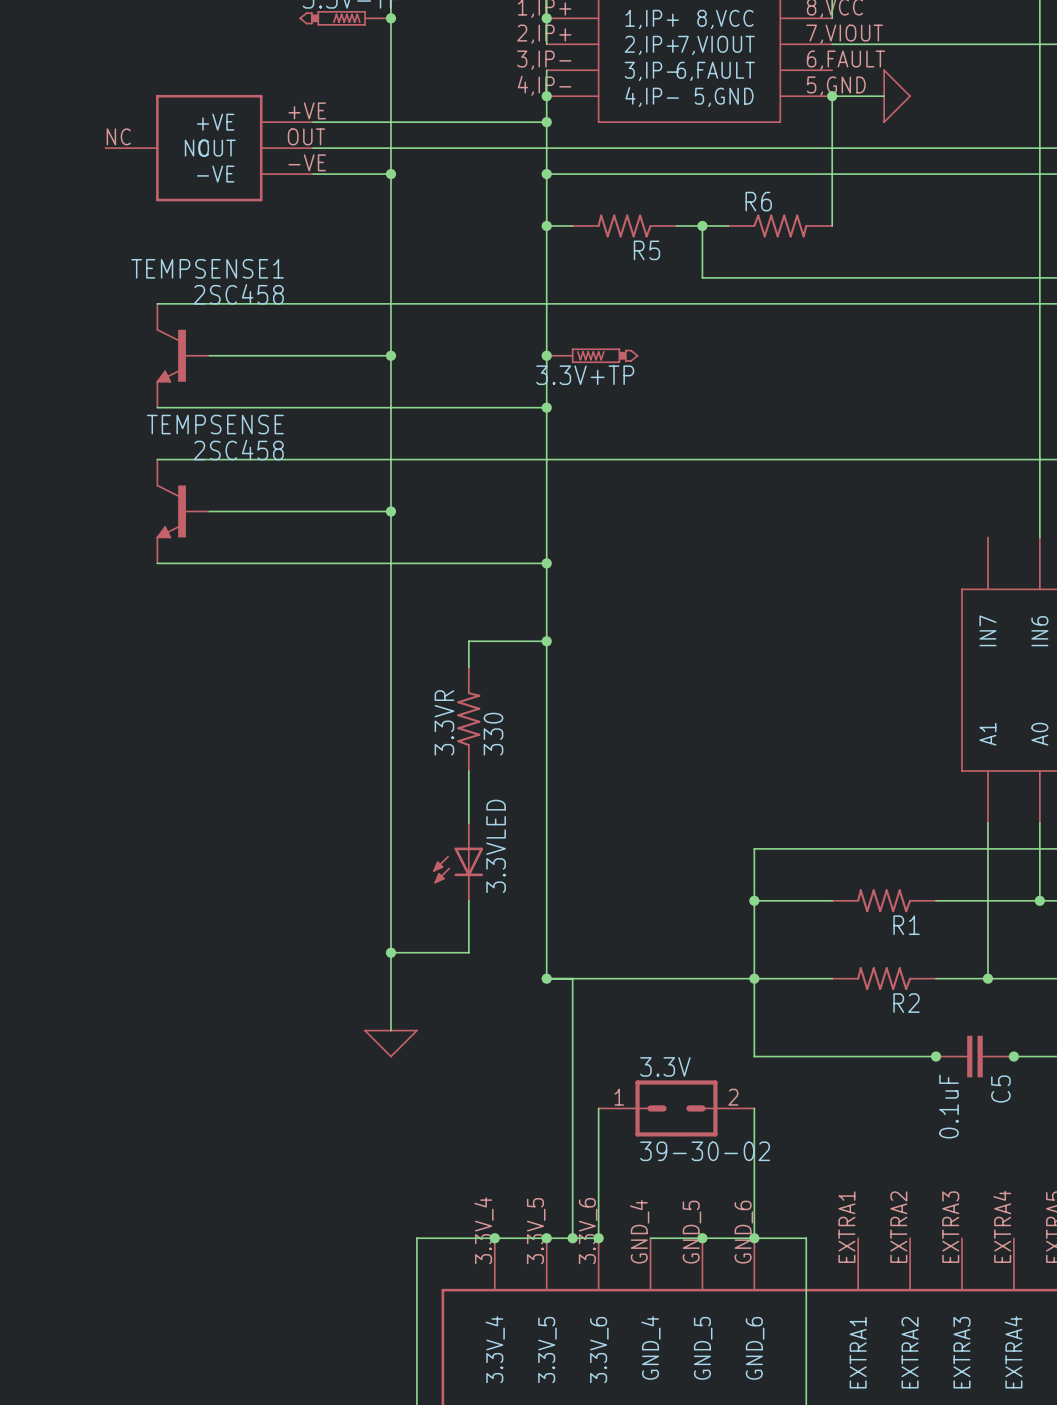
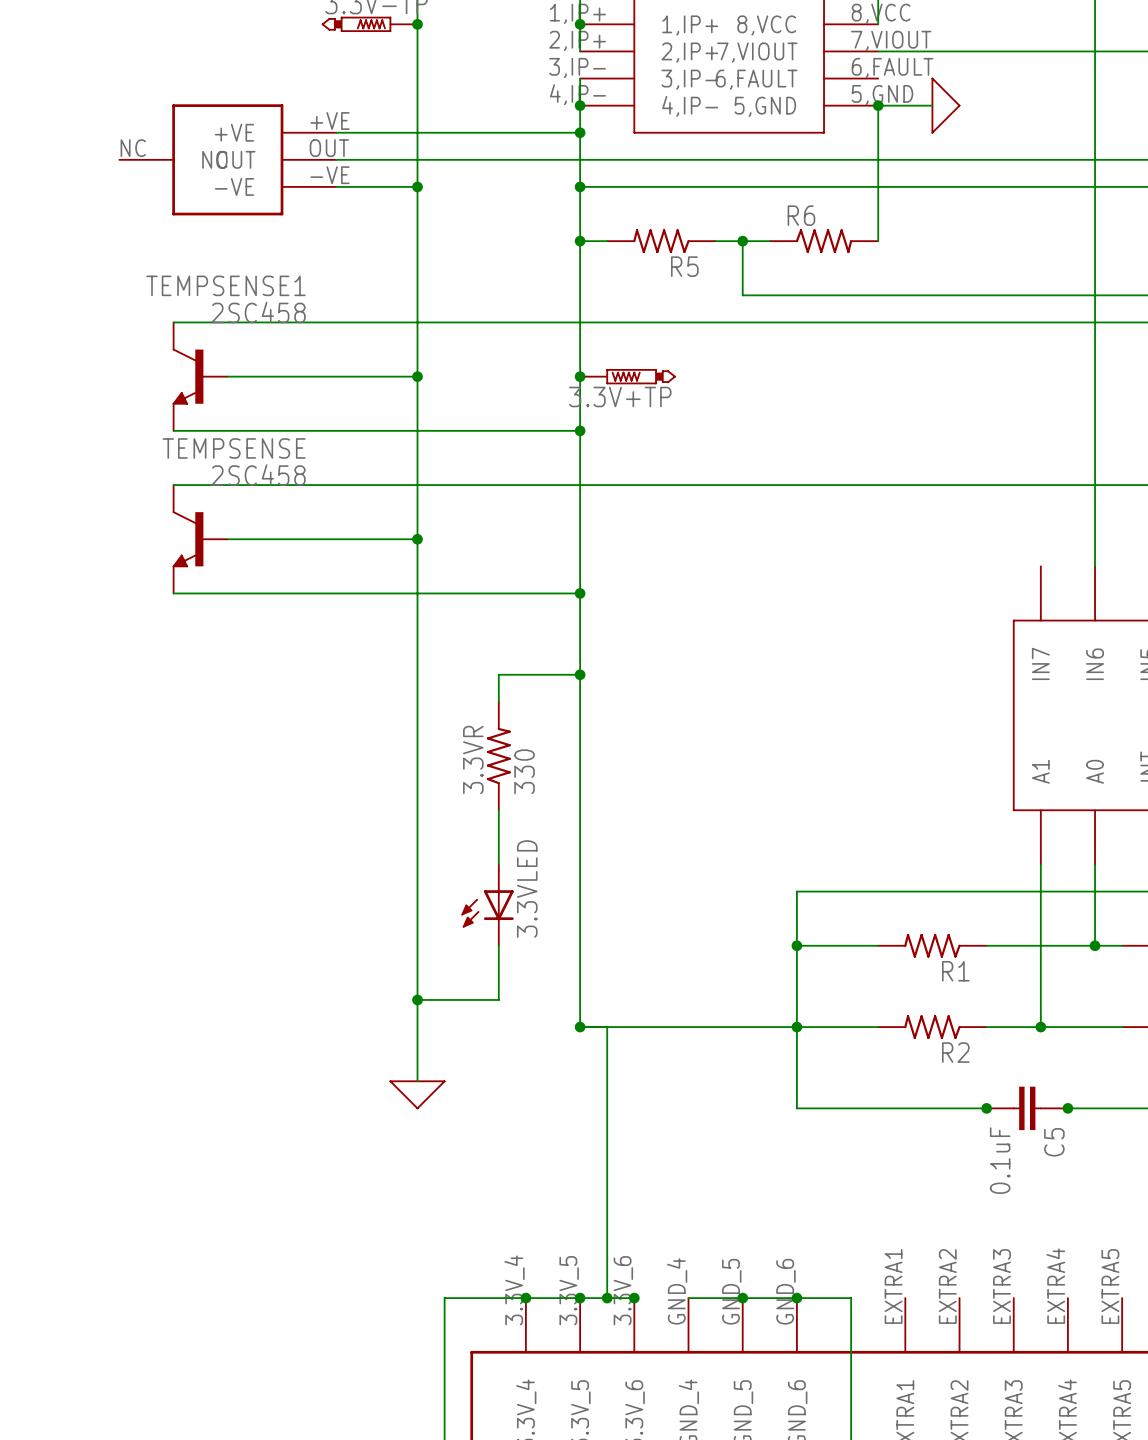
wire: (598, 1108) (598, 1238) -> none
3.3V: 39-30-02 (676, 1108) -> none
wire: (754, 1108) (754, 1238) -> none

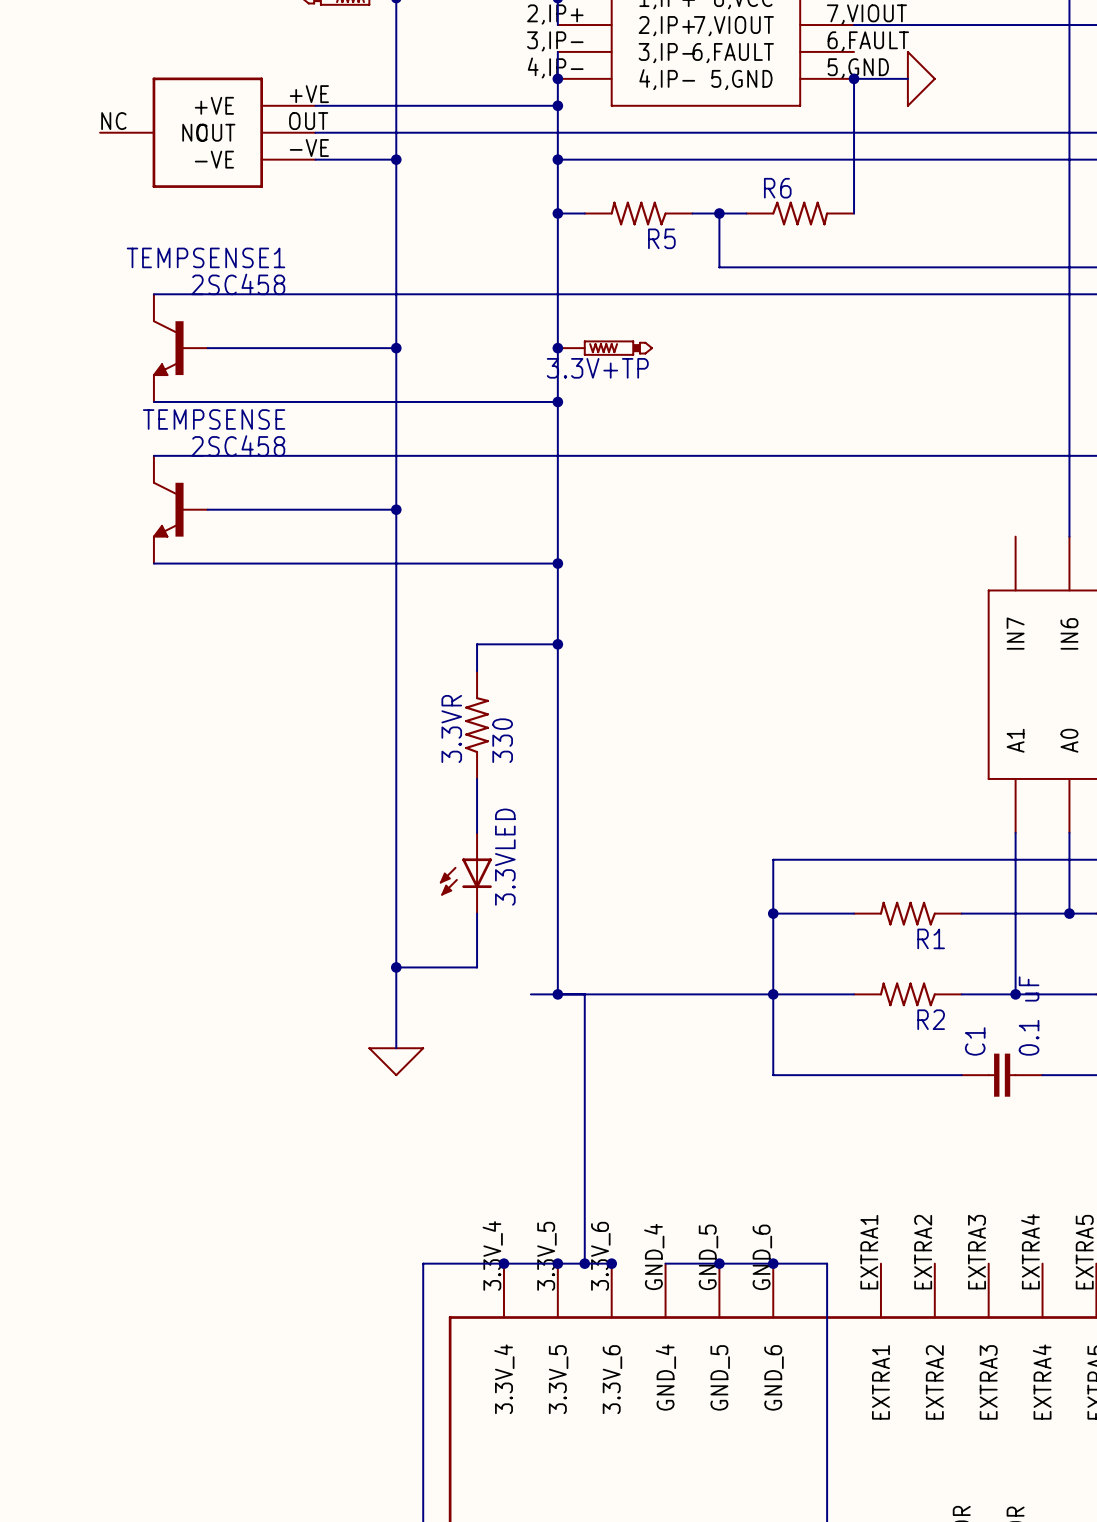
wire: none -> (530, 994) (557, 994)
junction: (986, 1108) -> none
junction: (1067, 1108) -> none
C5 name: C5 (1054, 1142) -> C1 (975, 1041)
C5 value: 0.1uF (1000, 1160) -> 0.1 uF (1029, 1016)

